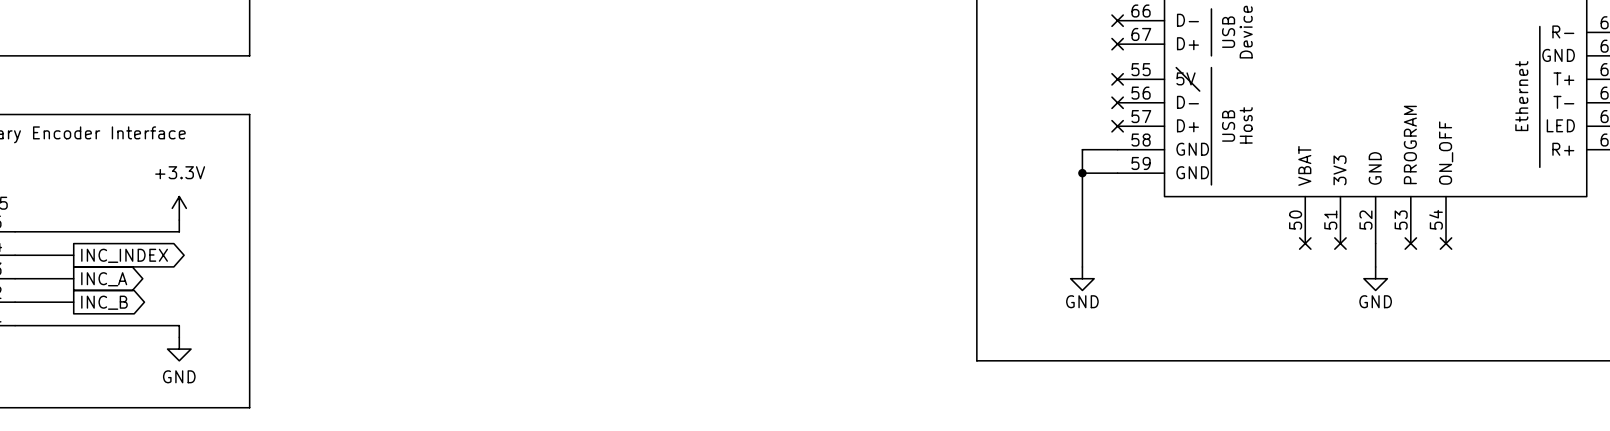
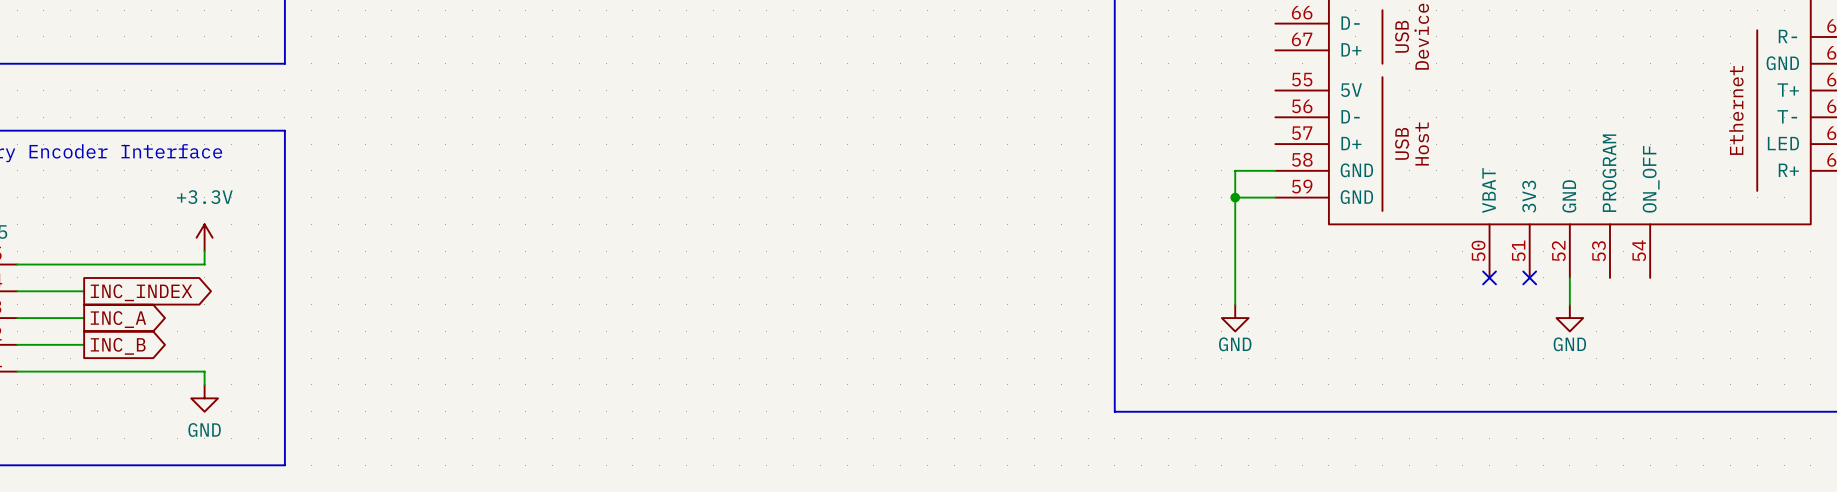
no-connect mark: (1117, 20) -> none
no-connect mark: (1117, 44) -> none
wire: (1176, 67) (1199, 91) -> none
no-connect mark: (1117, 79) -> none
no-connect mark: (1117, 102) -> none
no-connect mark: (1117, 126) -> none
no-connect mark: (1410, 243) -> none
no-connect mark: (1446, 243) -> none

